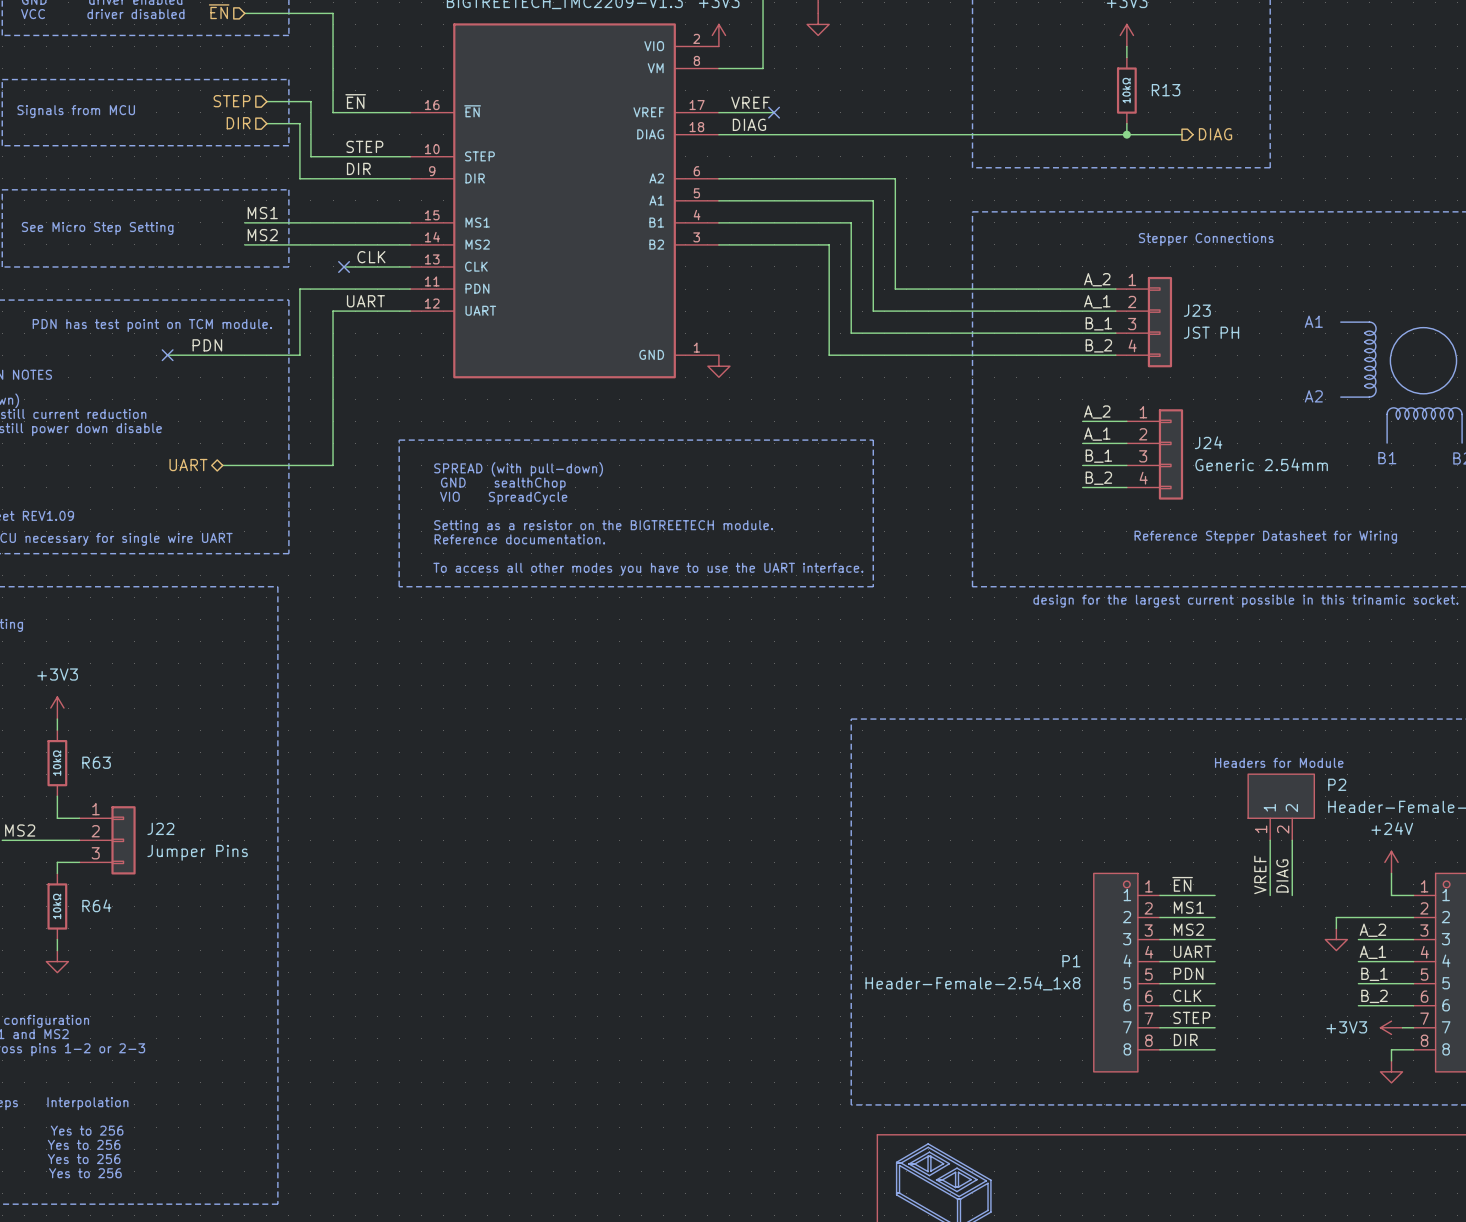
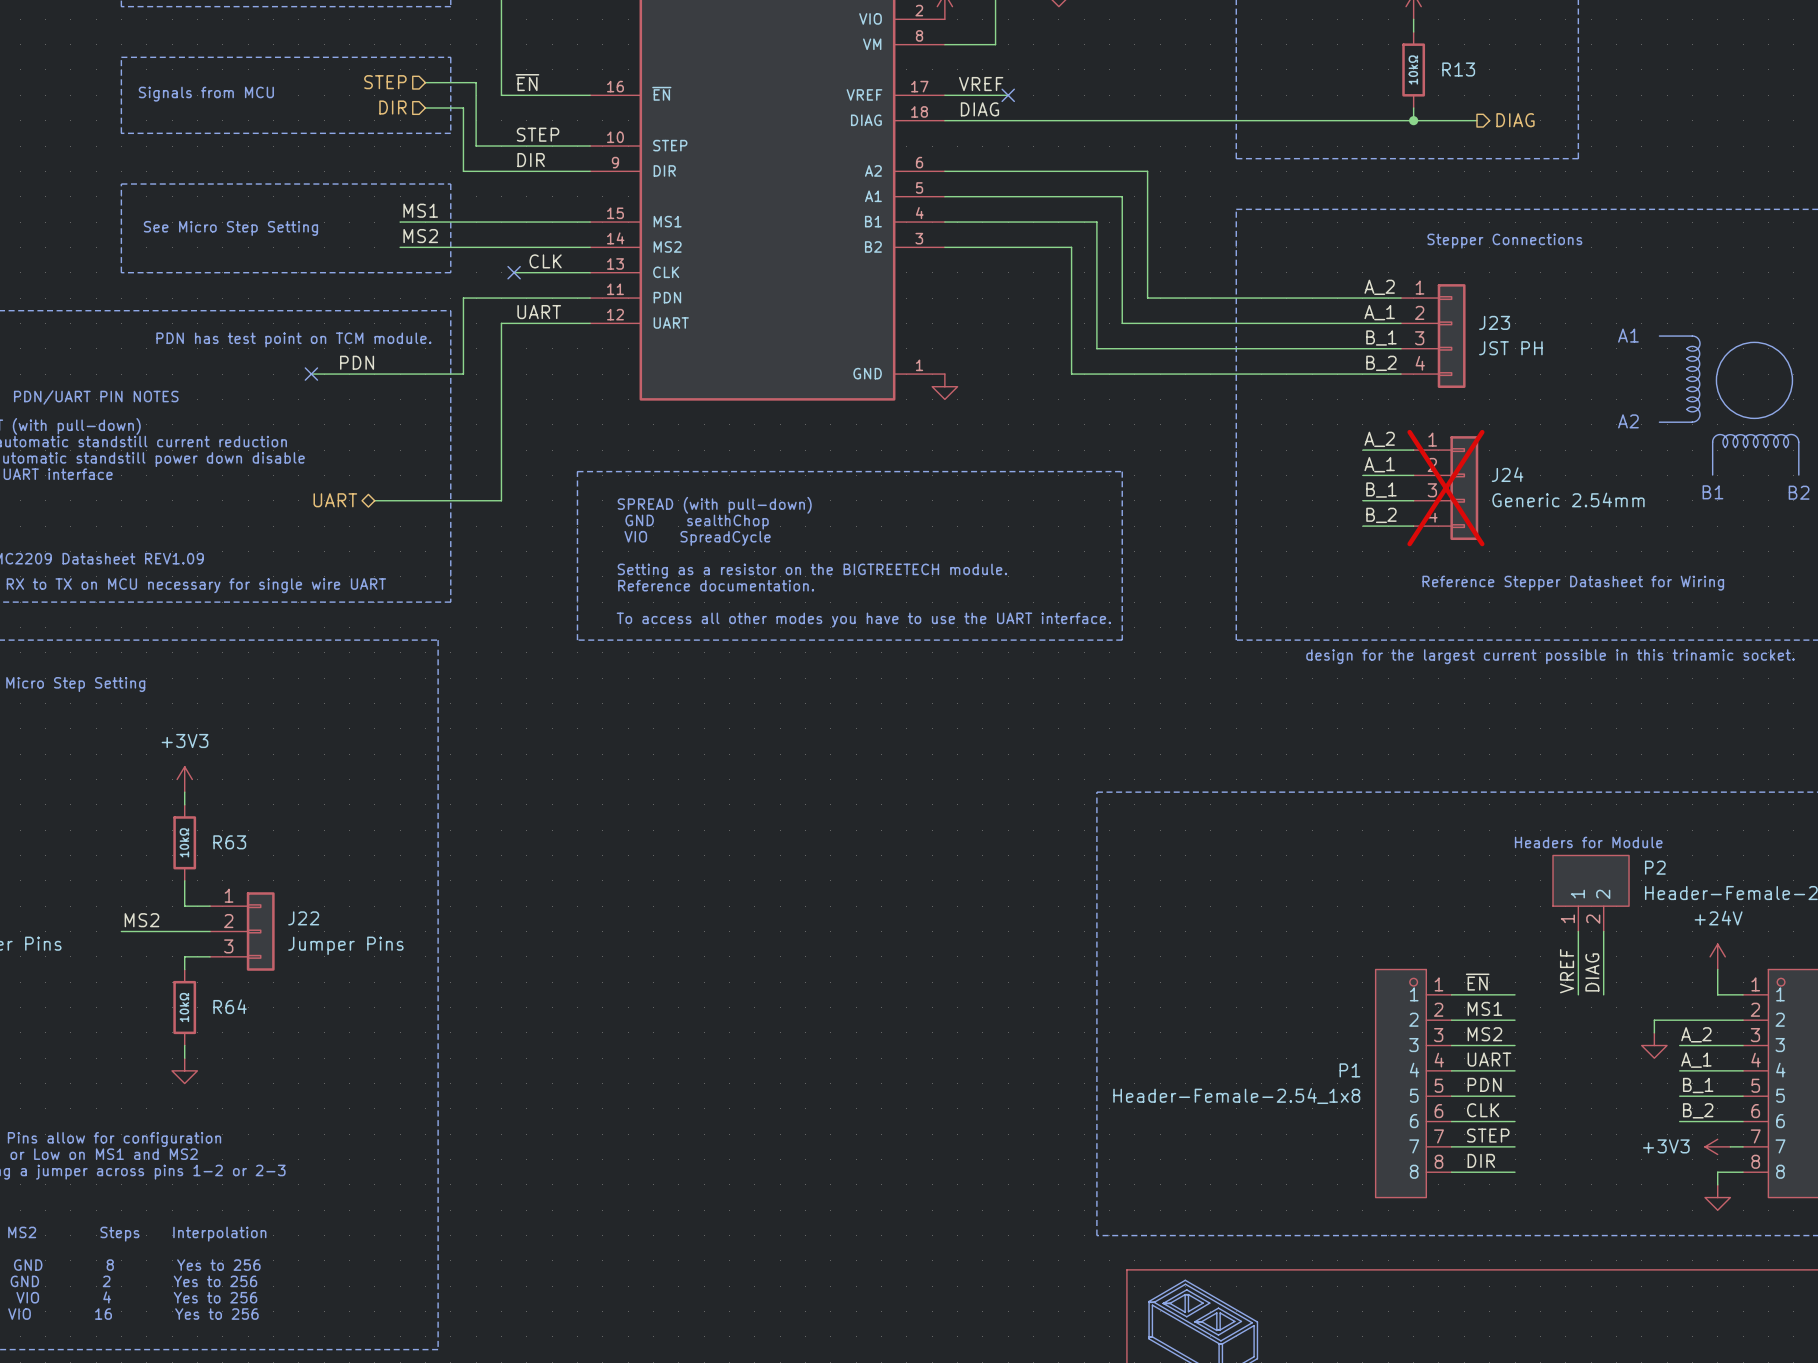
J24 do-not-place cross: none -> (1445, 488)

